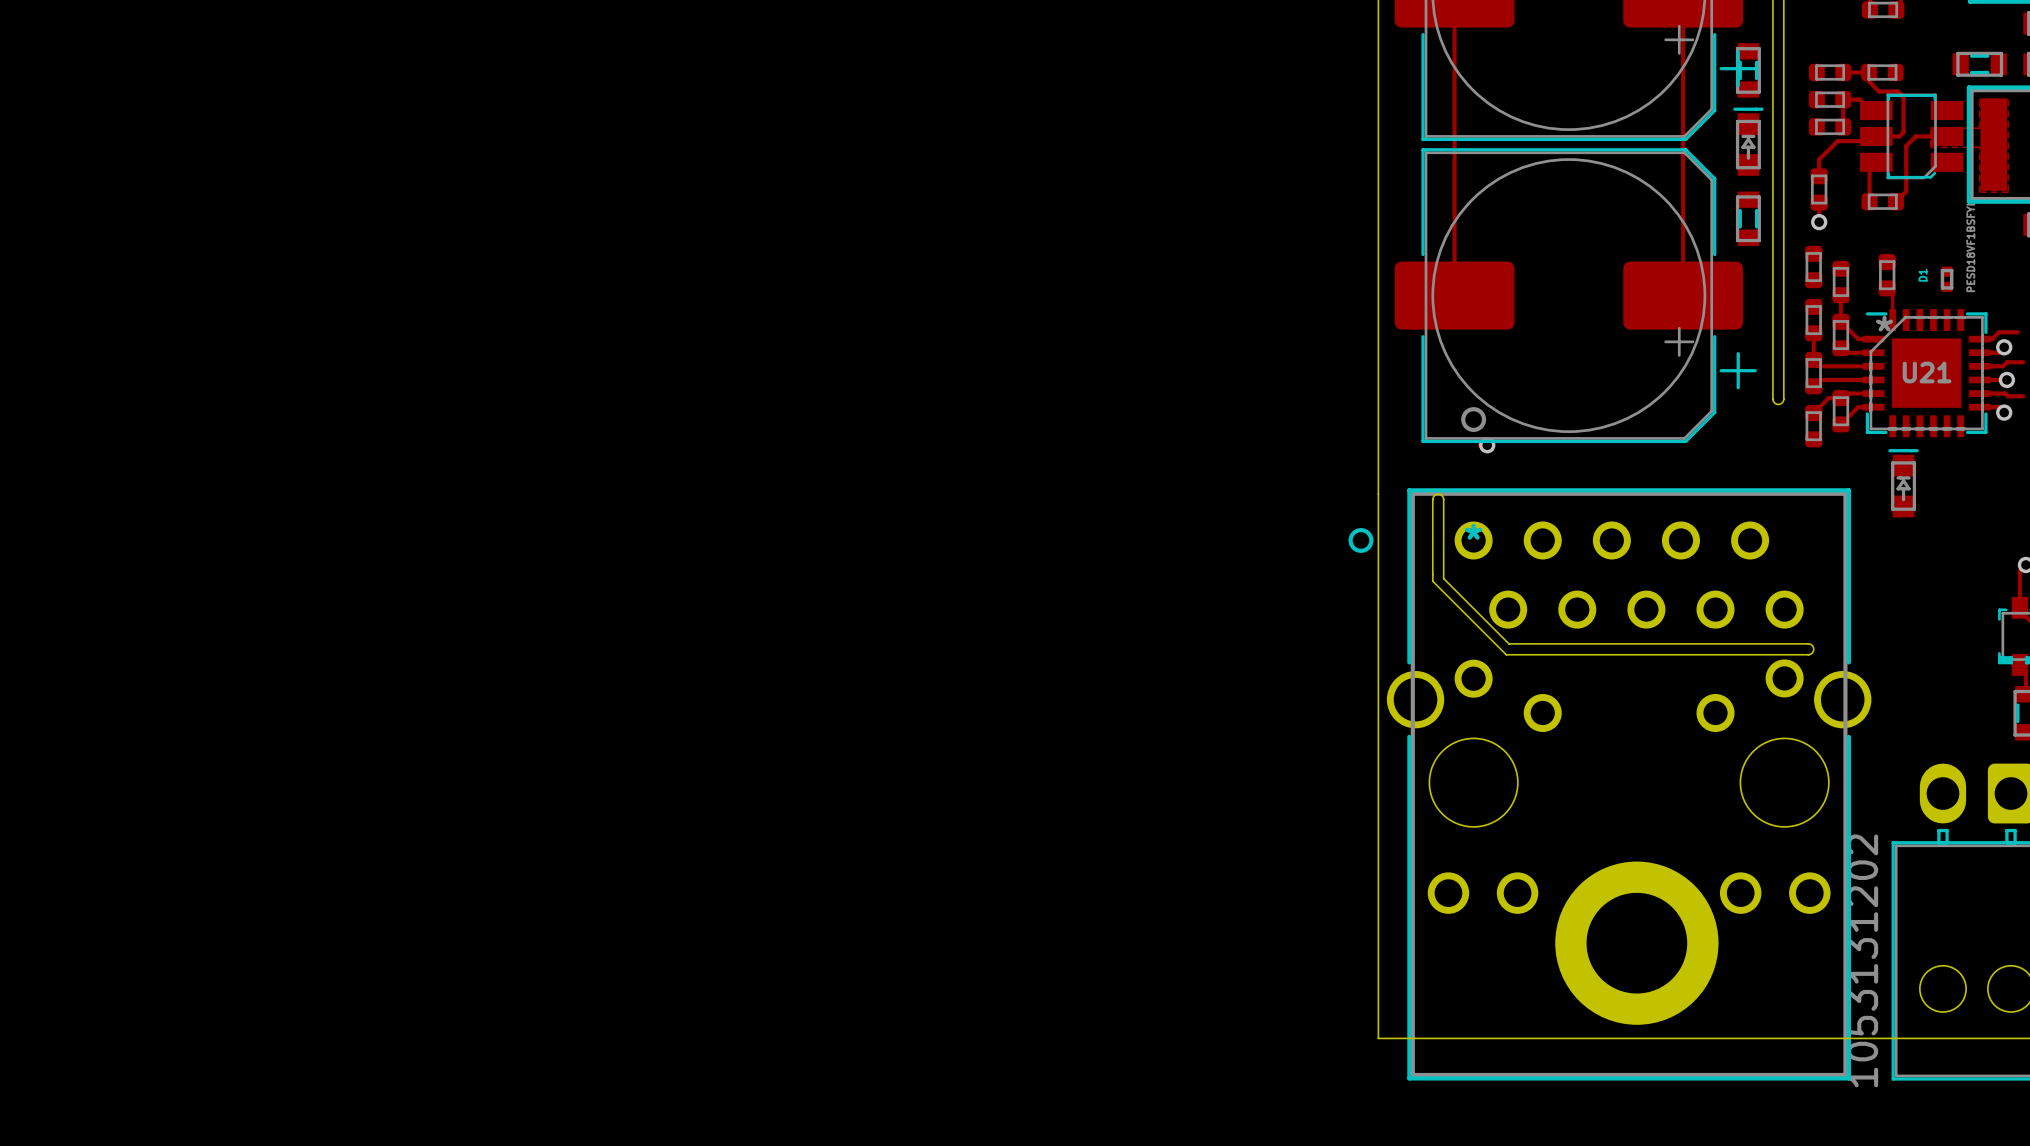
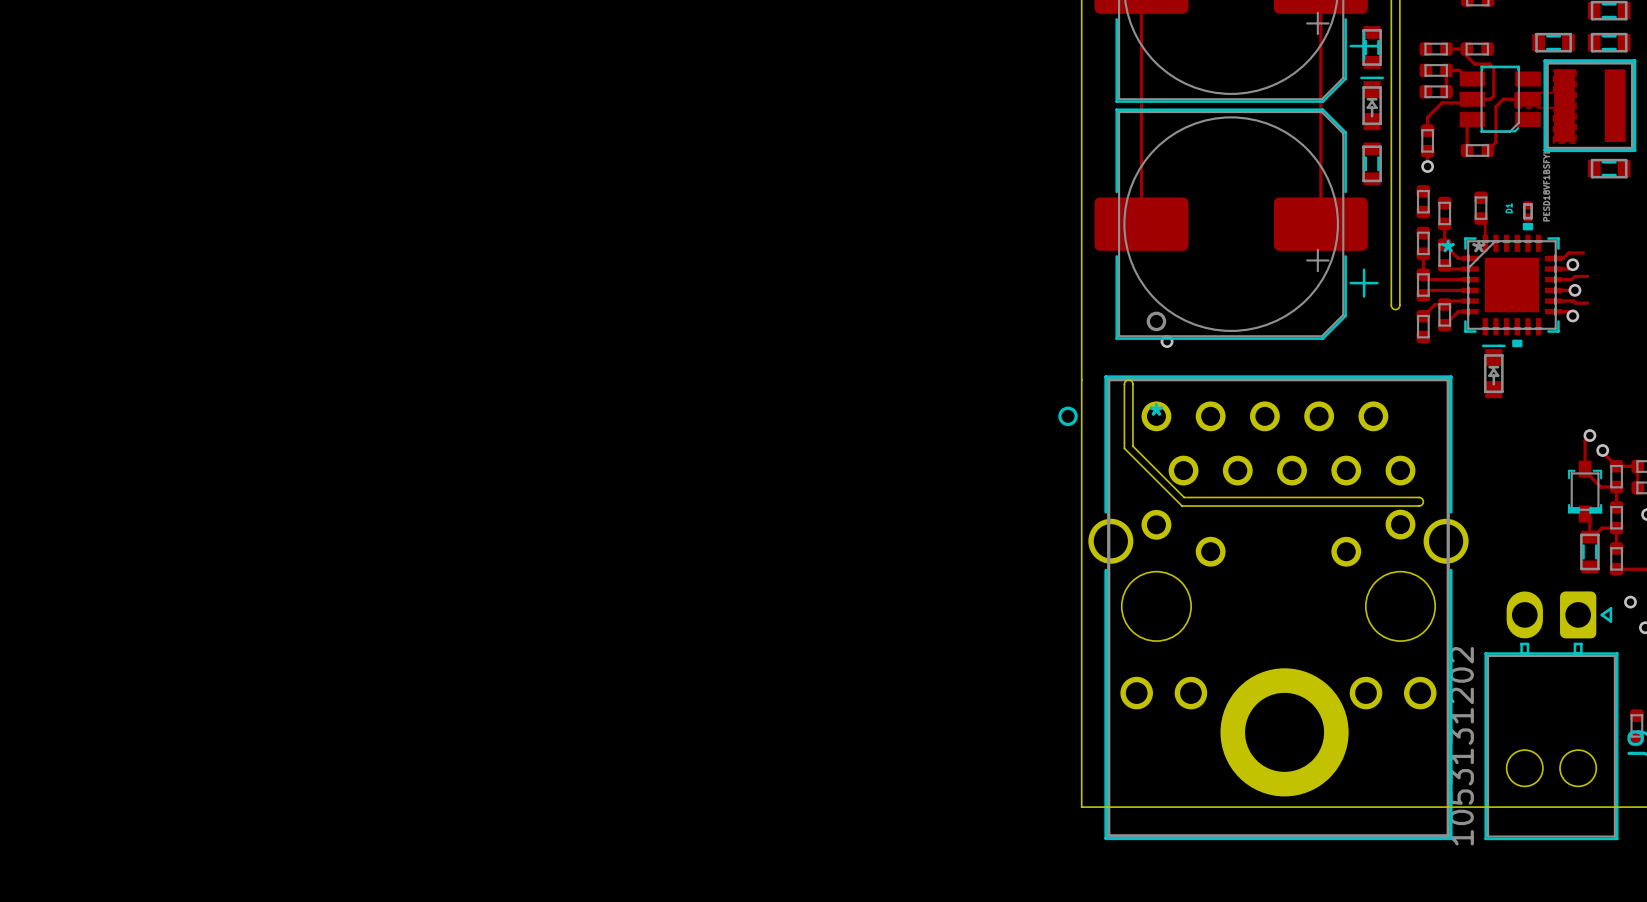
U21: (1926, 373) -> none
part: none -> (1511, 285)

